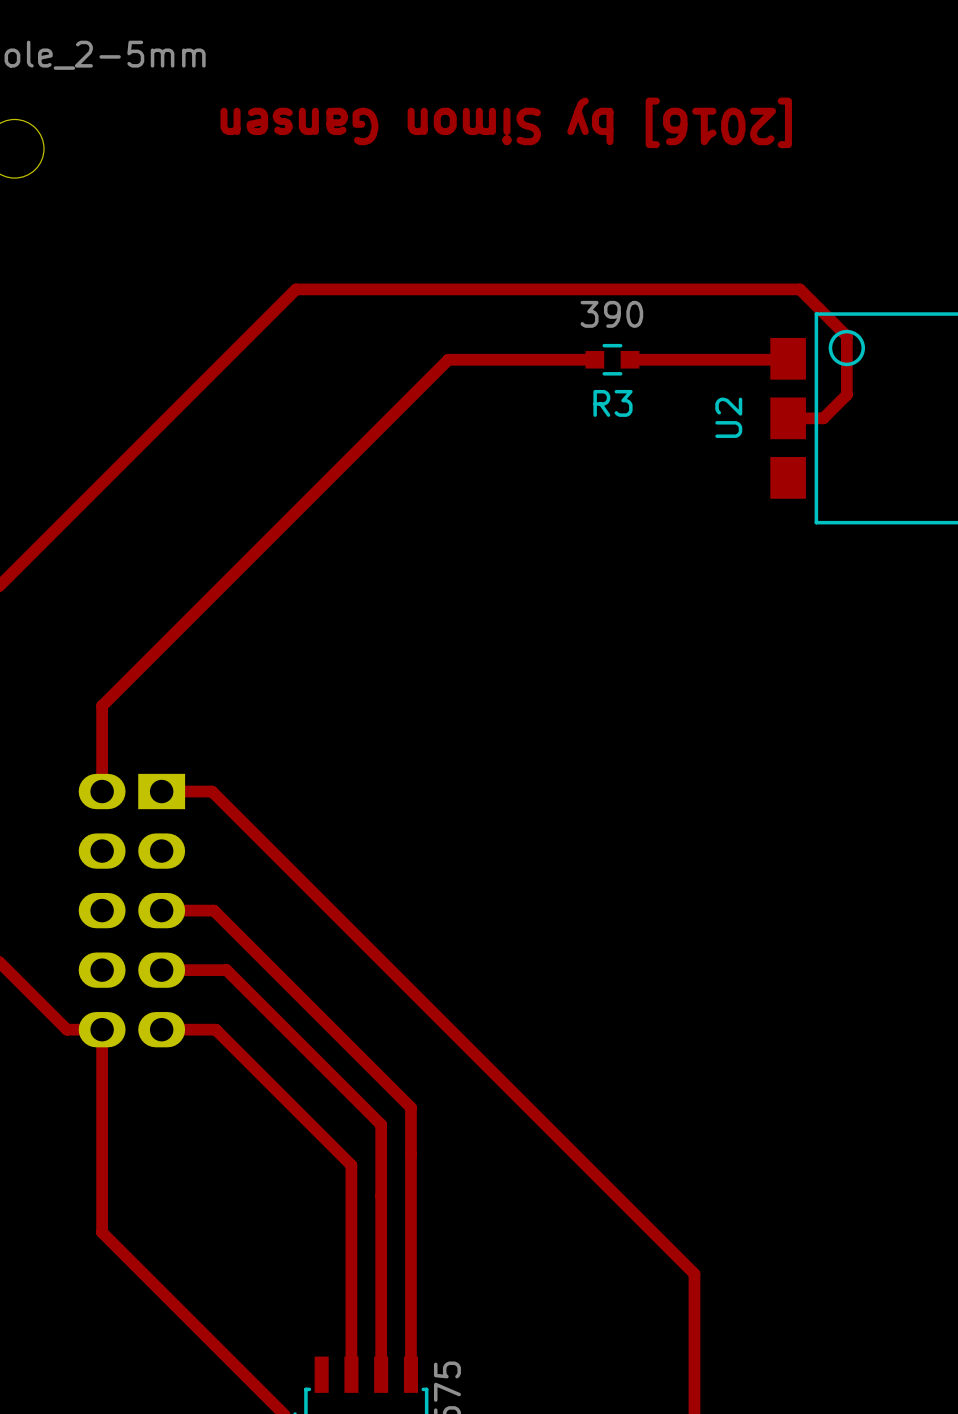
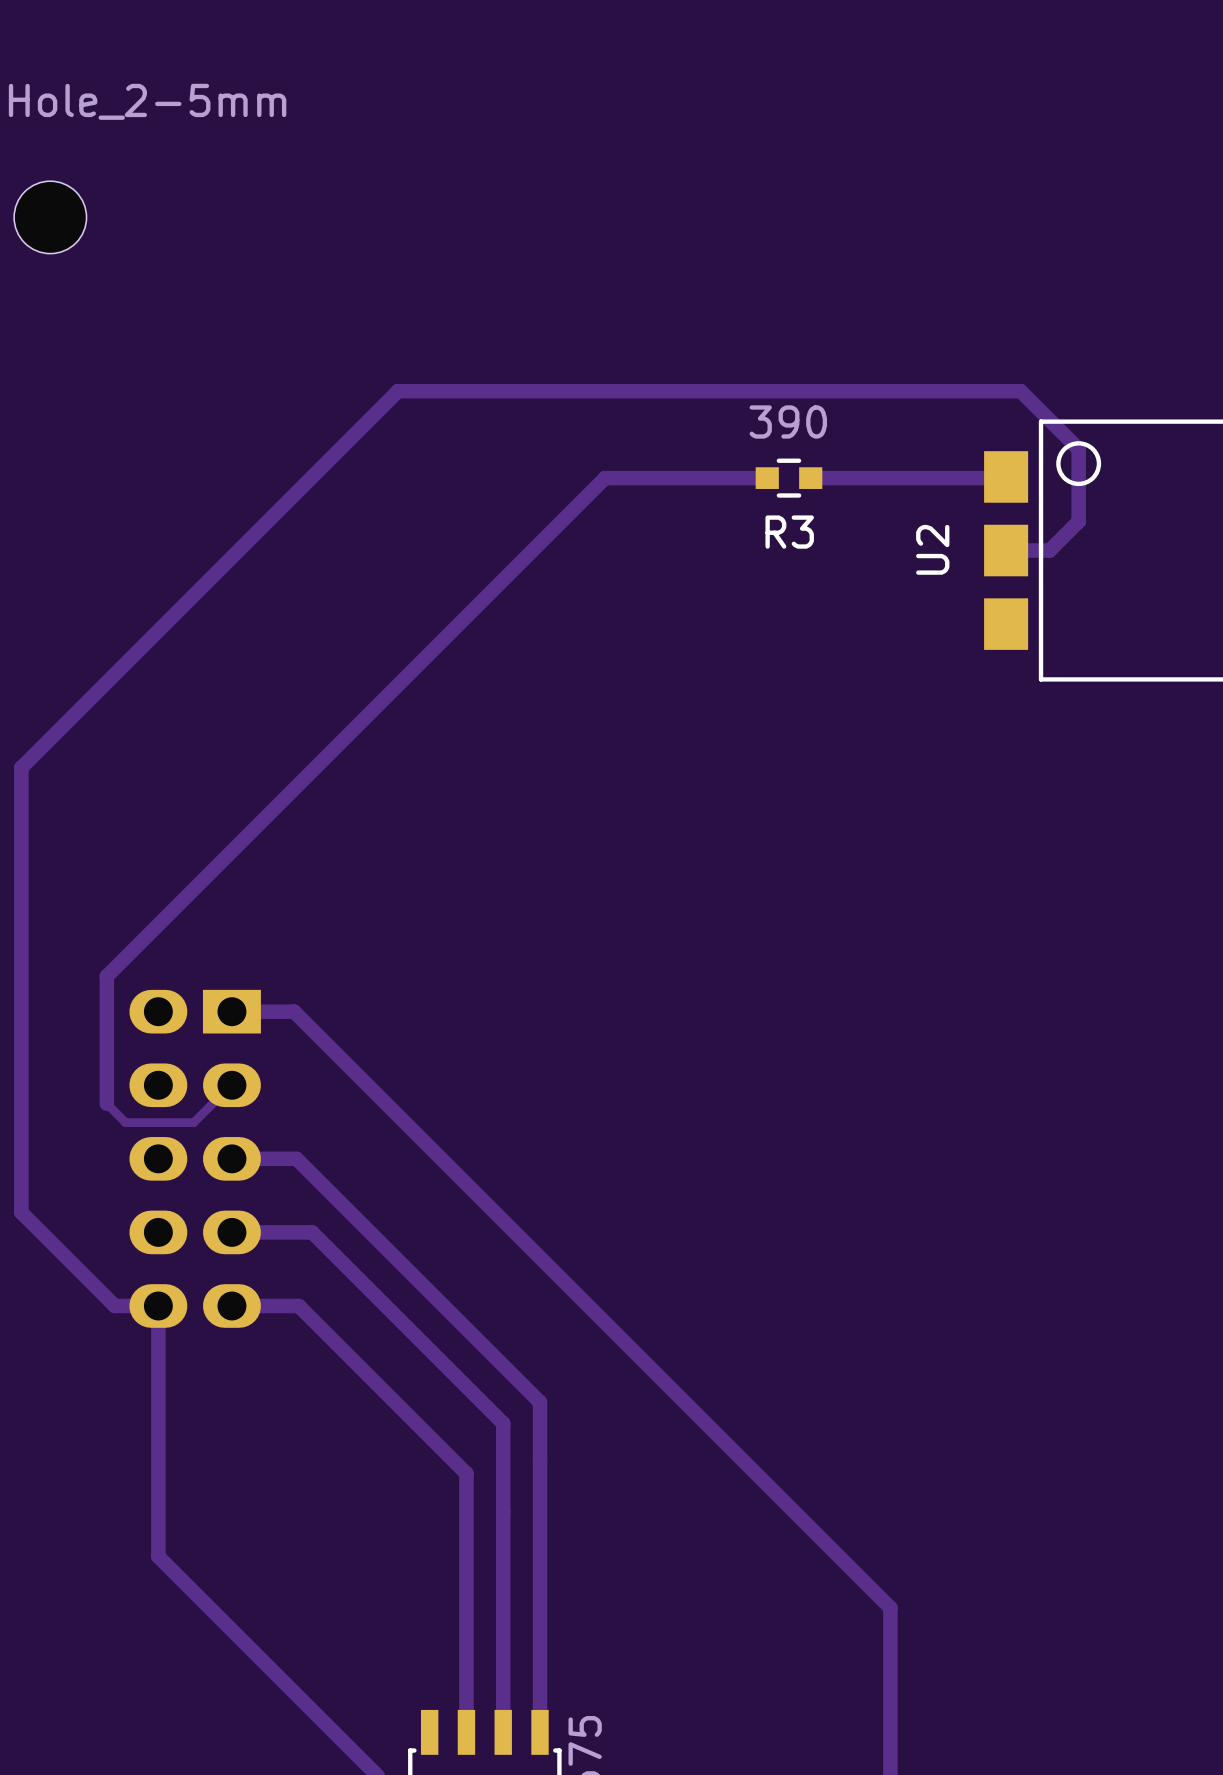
text: [2016] by Simon Gansen (506, 122) -> none
track: (463, 359) (448, 359) (102, 705) (102, 791) -> (605, 478) (106, 976) (106, 1103) (125, 1122) (193, 1122) (231, 1085)

